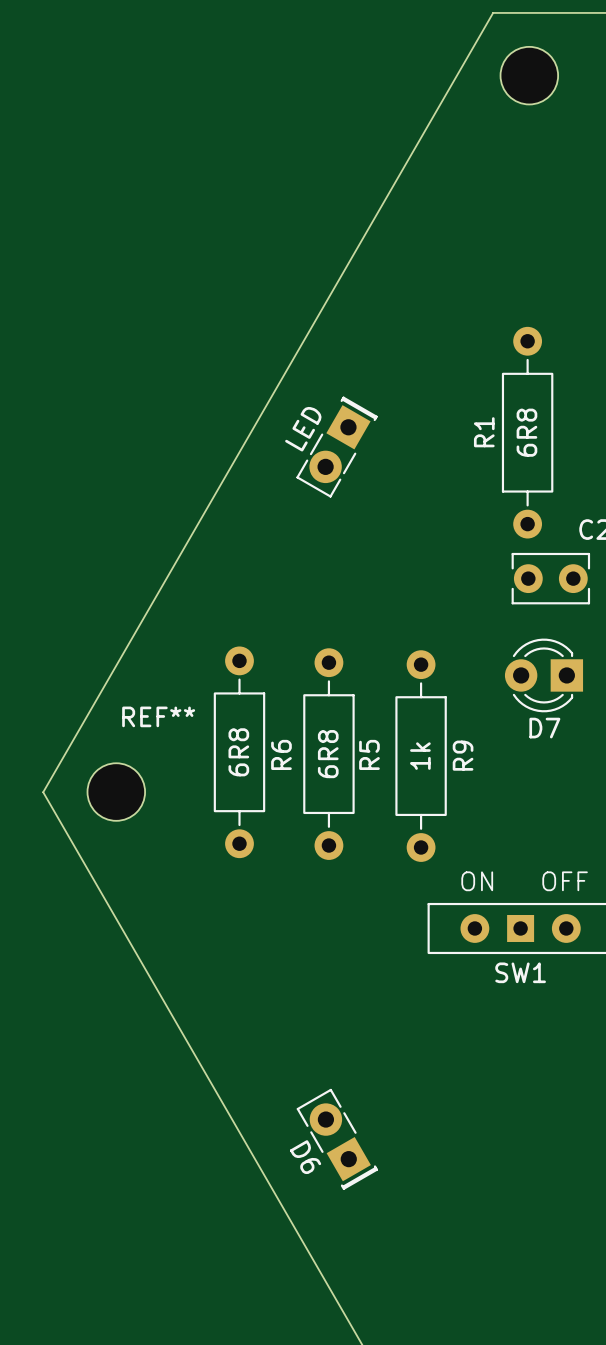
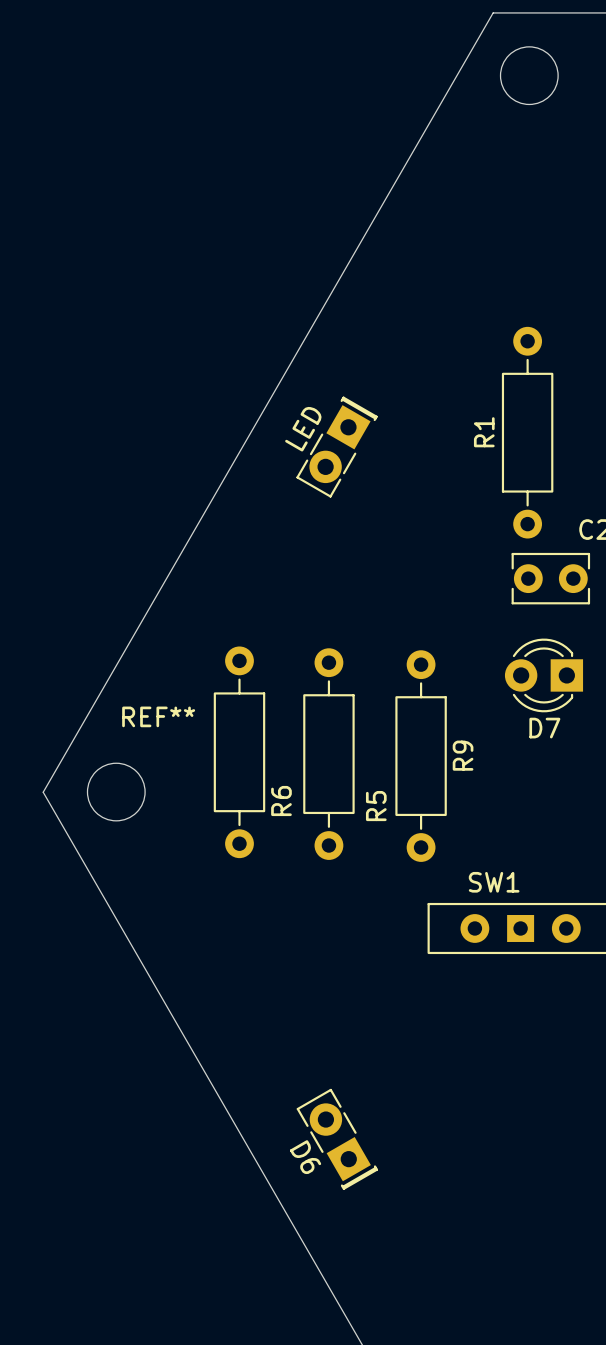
R1 value: 6R8 (526, 432) -> none
R6 value: 6R8 (238, 752) -> none
R6 name position: R6 (281, 754) -> R6 (281, 801)
R5 value: 6R8 (328, 754) -> none
R5 name position: R5 (369, 754) -> R5 (376, 806)
R9 value: 1k (420, 756) -> none
SW1 text: ON (477, 881) -> none
SW1 text: OFF (565, 881) -> none
SW1 name position: SW1 (520, 972) -> SW1 (494, 882)

